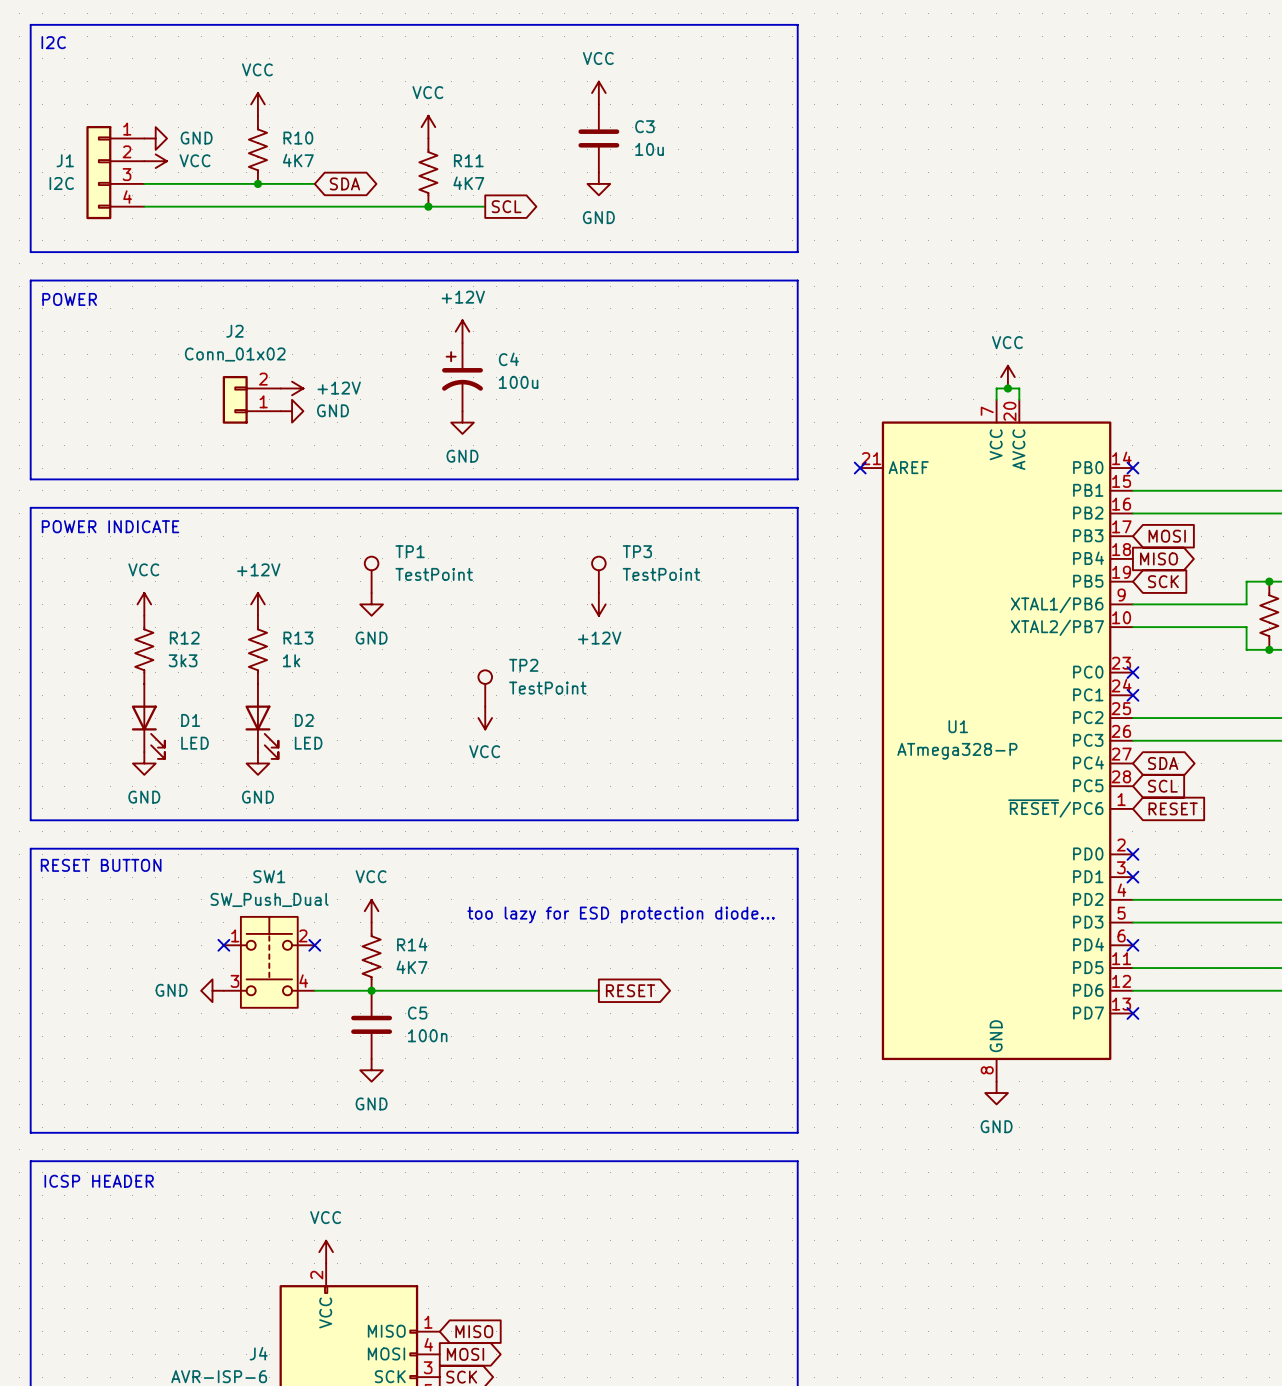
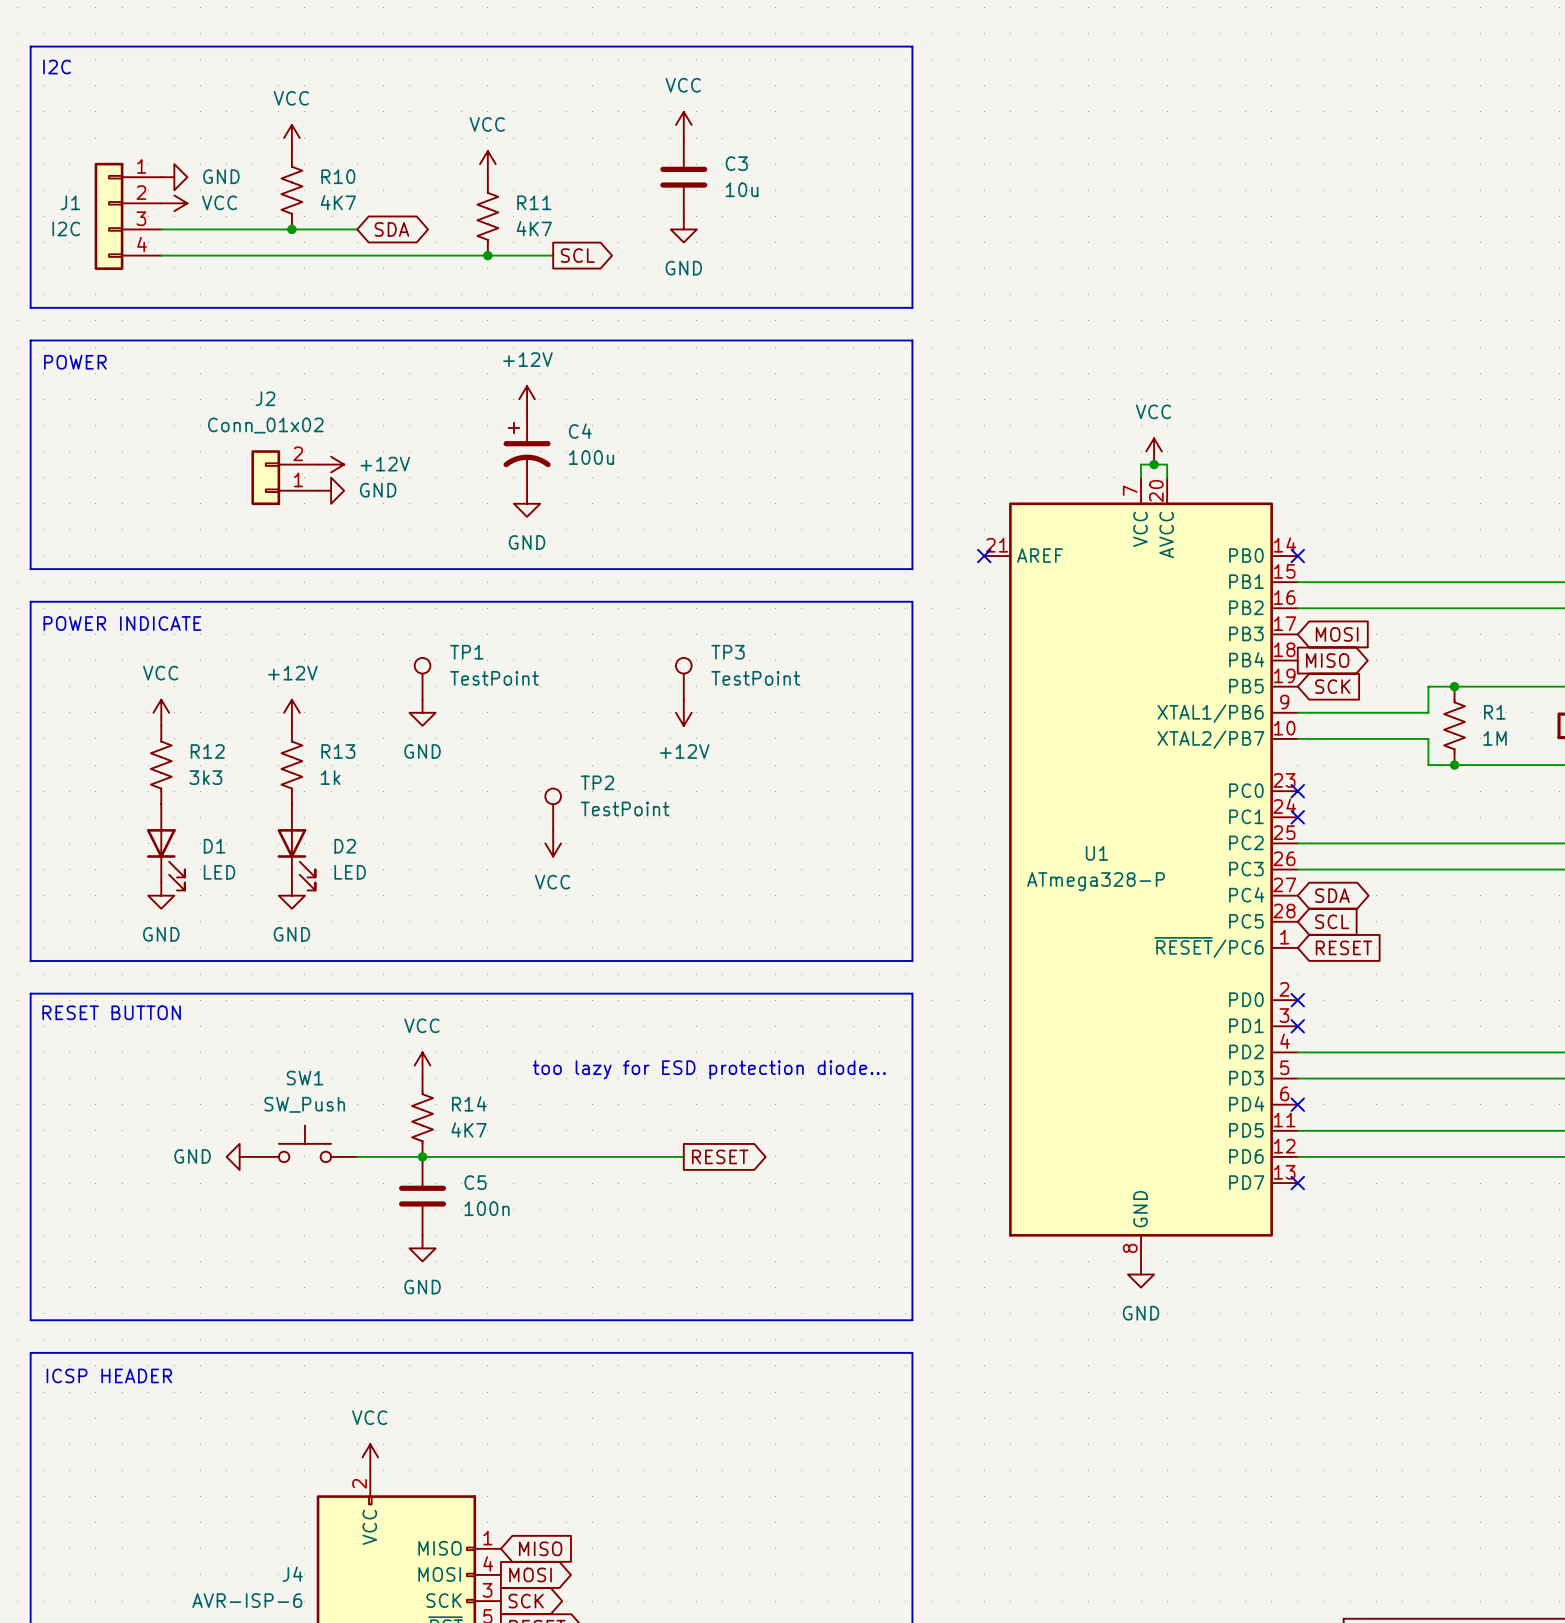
SW1 name position: SW1 (269, 876) -> SW1 (304, 1078)
SW1 value: SW_Push_Dual (269, 899) -> SW_Push (304, 1104)
SW1 symbol: [223, 916, 315, 1008] -> [252, 1125, 358, 1163]
no-connect mark: (223, 945) -> none
no-connect mark: (314, 945) -> none

